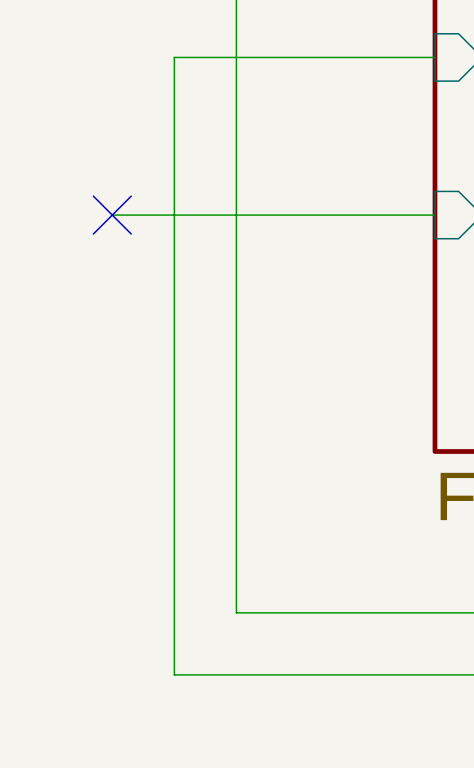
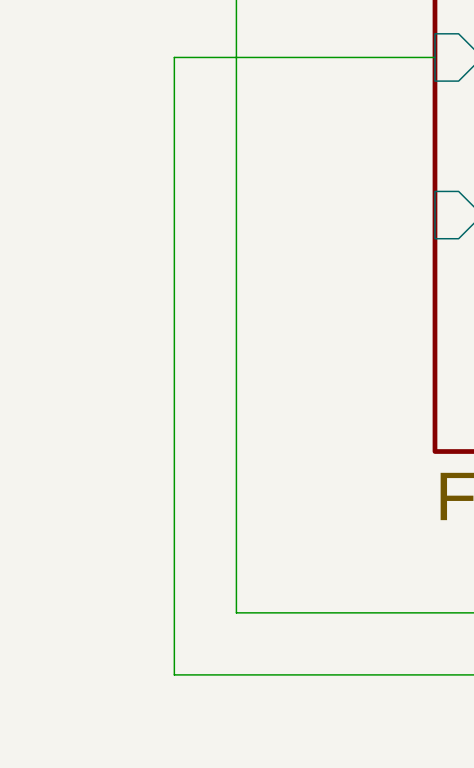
wire: (112, 215) (434, 215) -> none
no-connect mark: (112, 215) -> none

